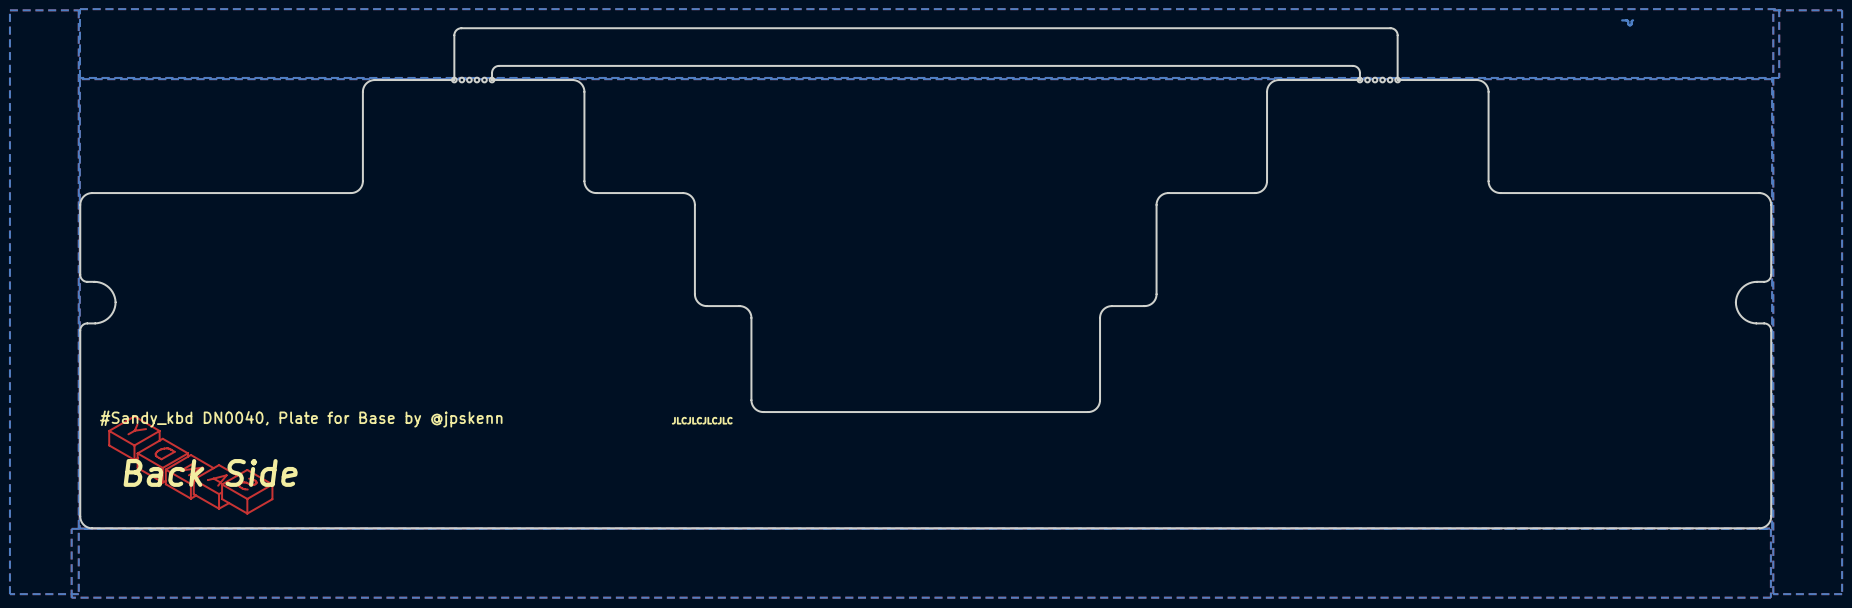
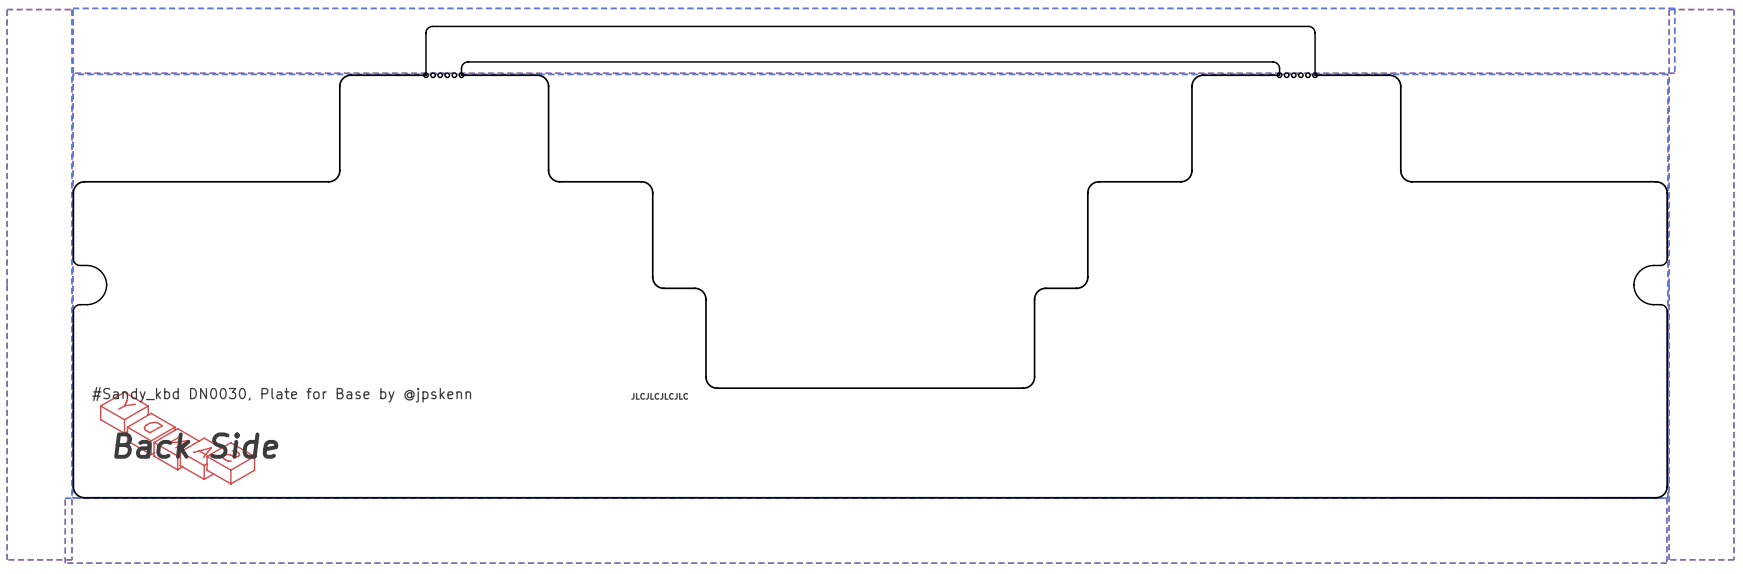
bottom track: (1633, 20) (1630, 25) (1627, 20) (1622, 20) -> none
text: #Sandy_kbd DN0040, Plate for Base by @jpskenn (301, 419) -> #Sandy_kbd DN0030, Plate for Base by @jpskenn (281, 394)

